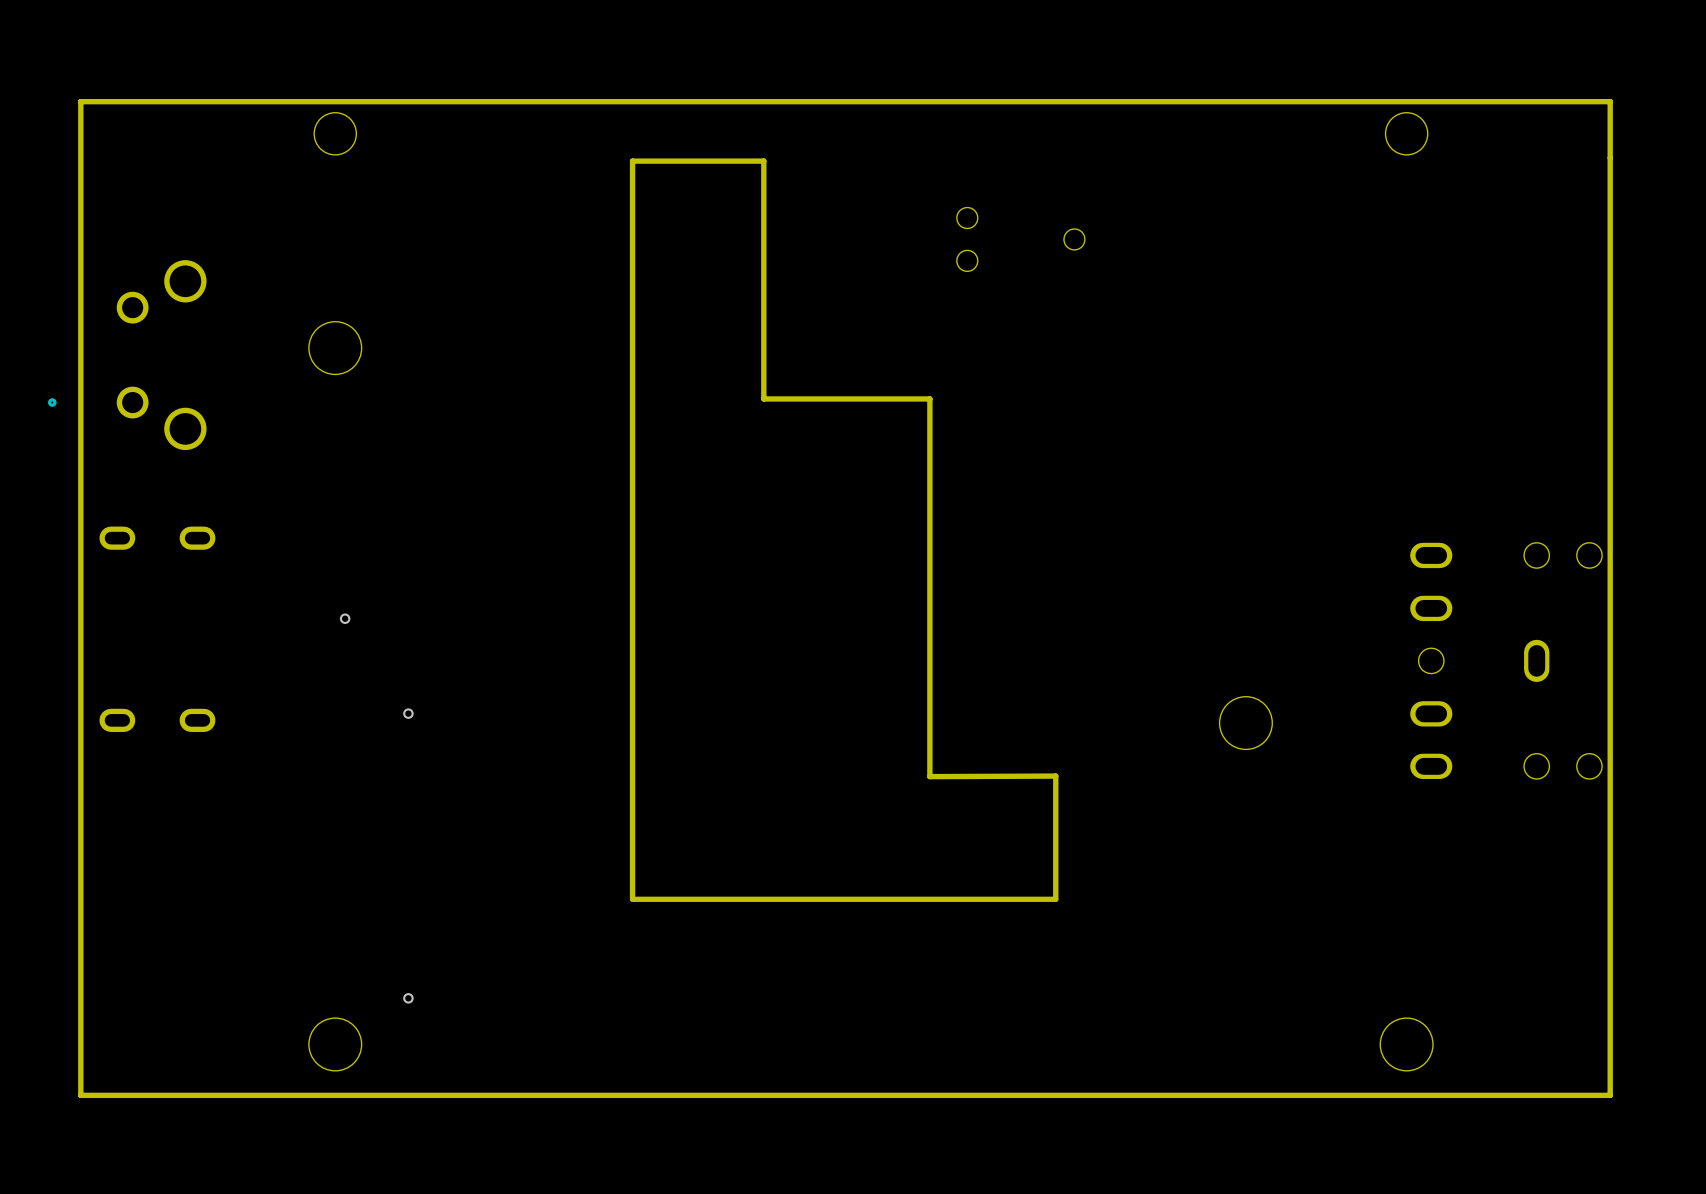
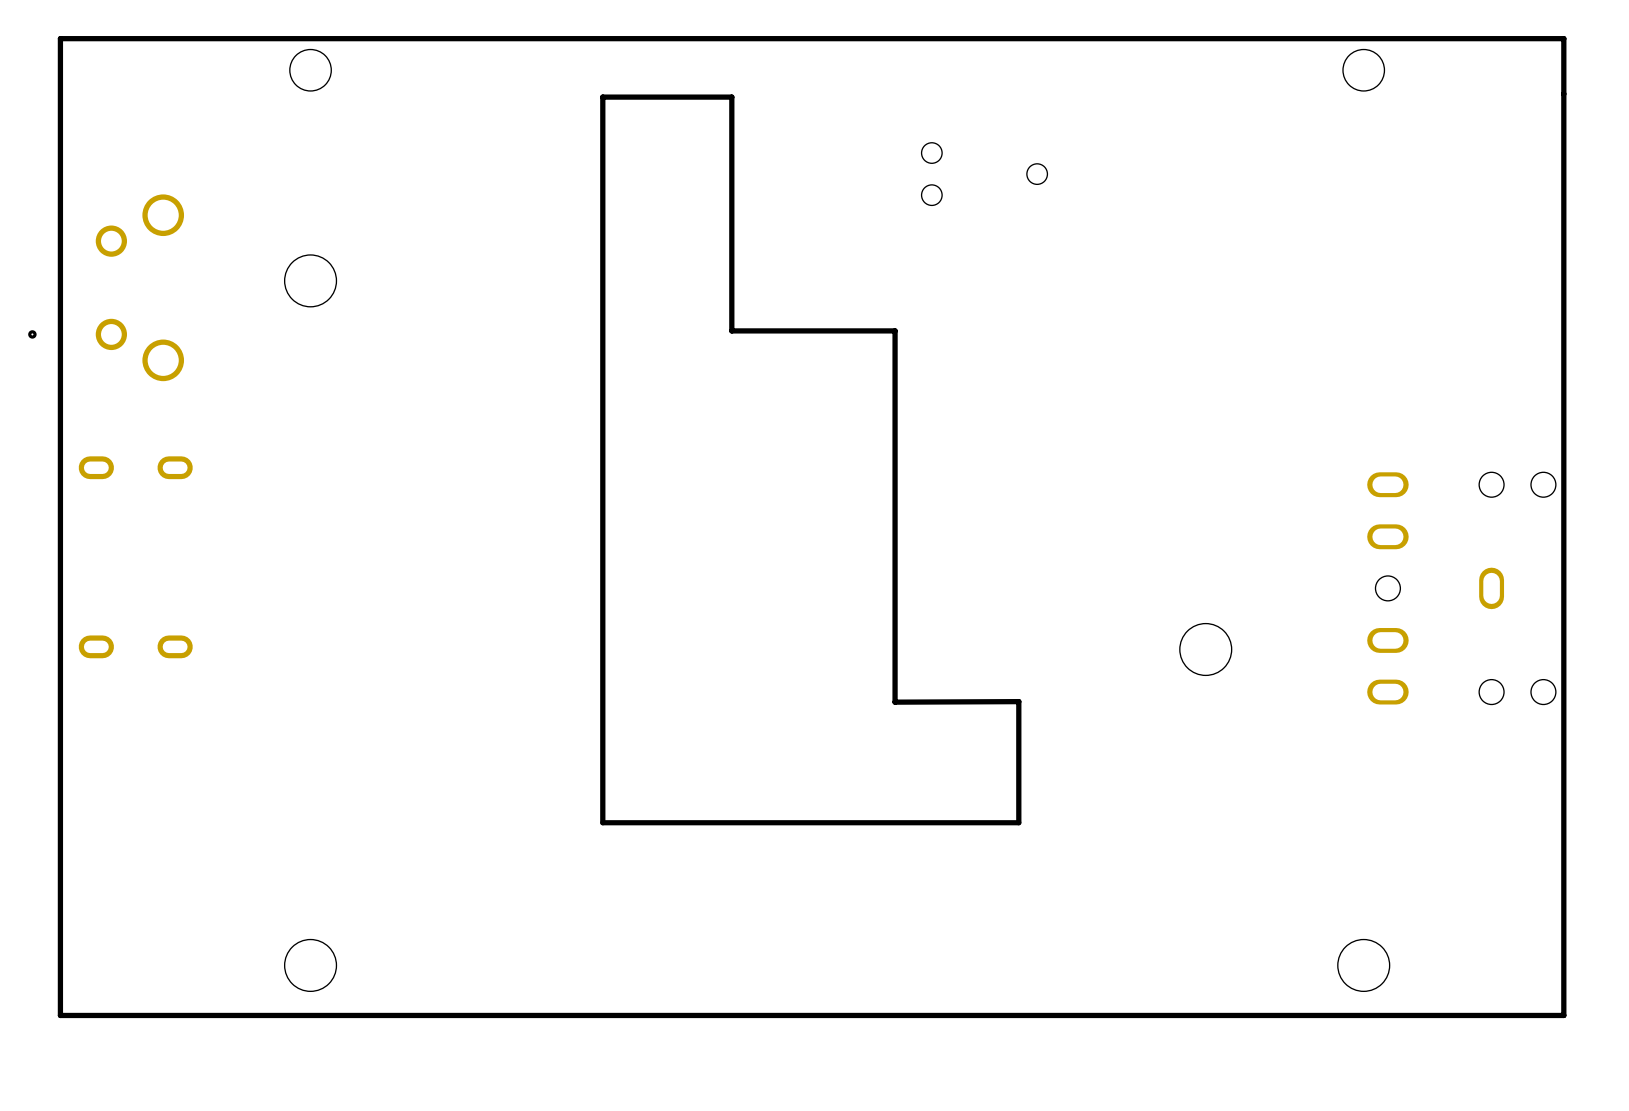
via: (345, 618) -> none
via: (408, 713) -> none
via: (408, 998) -> none

